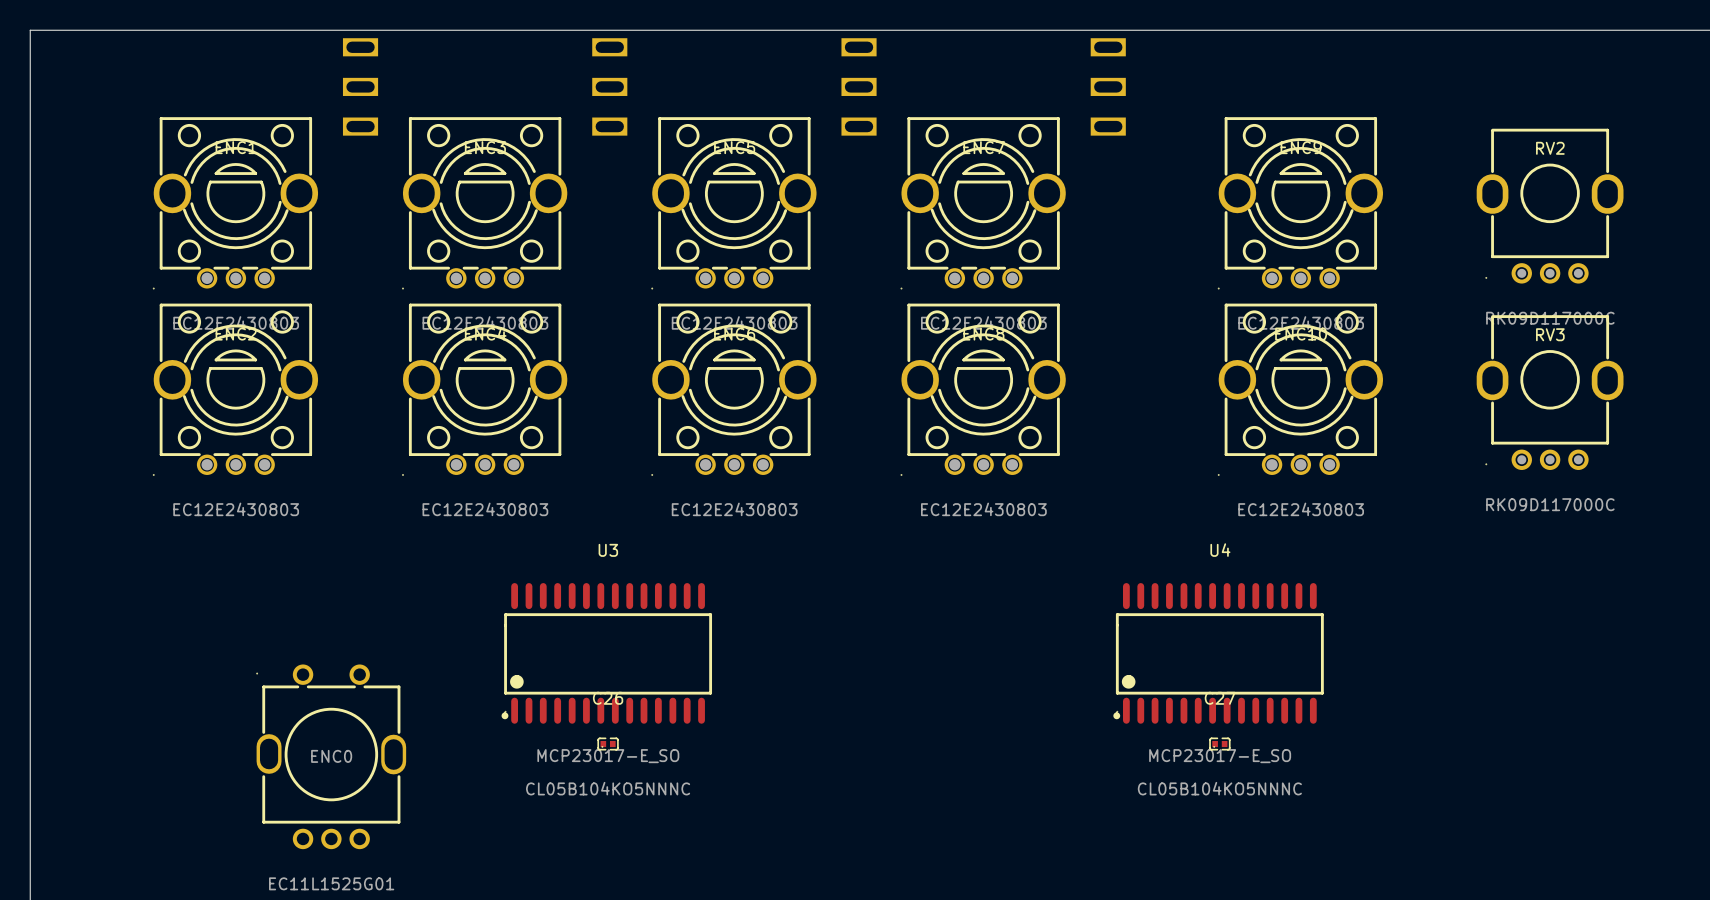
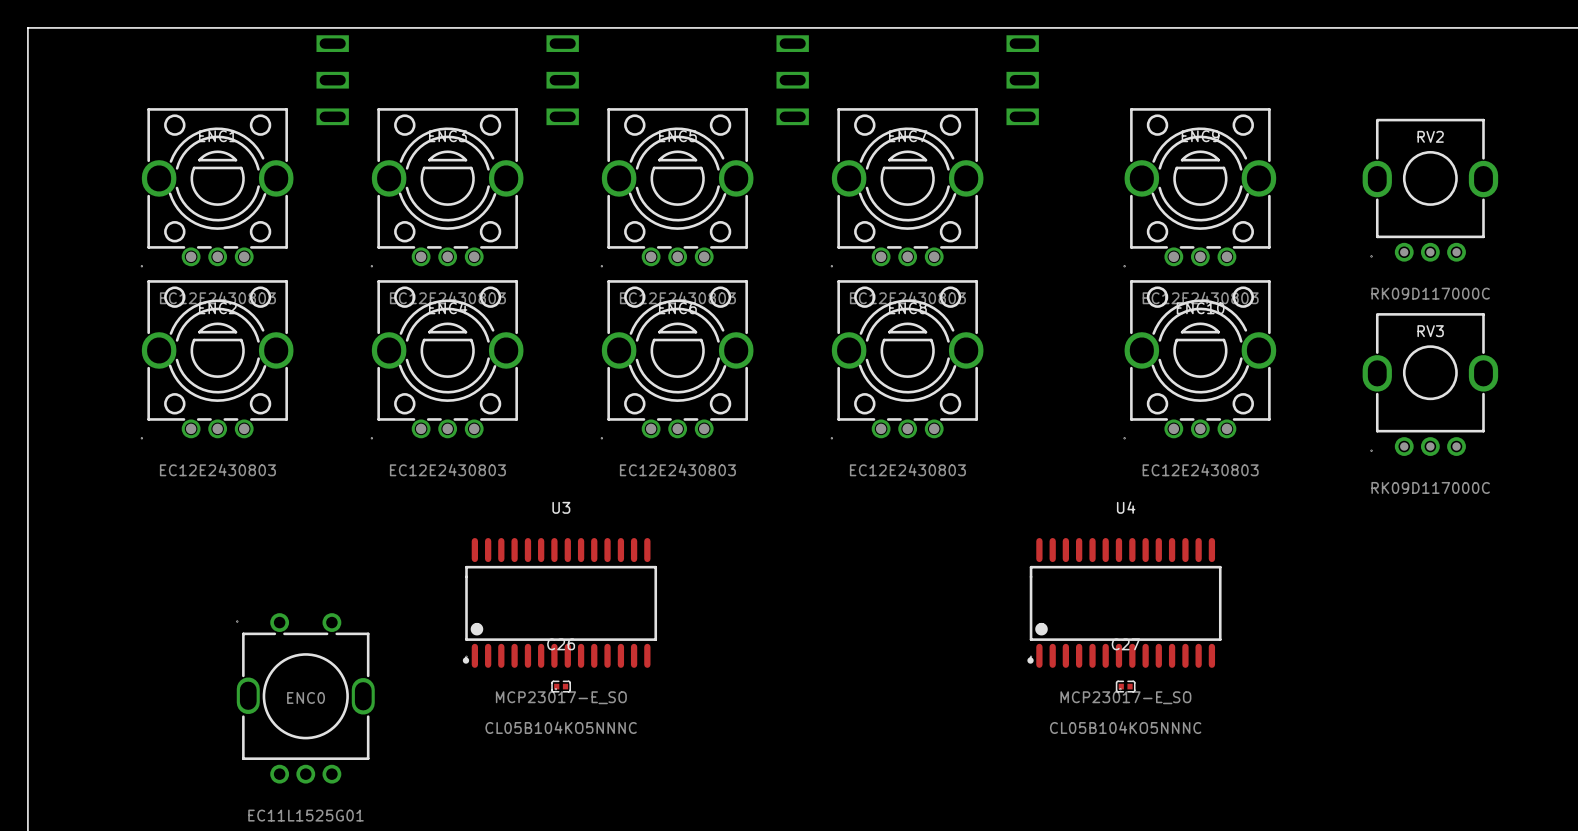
RV3 position: (1550, 392) -> (1430, 384)

